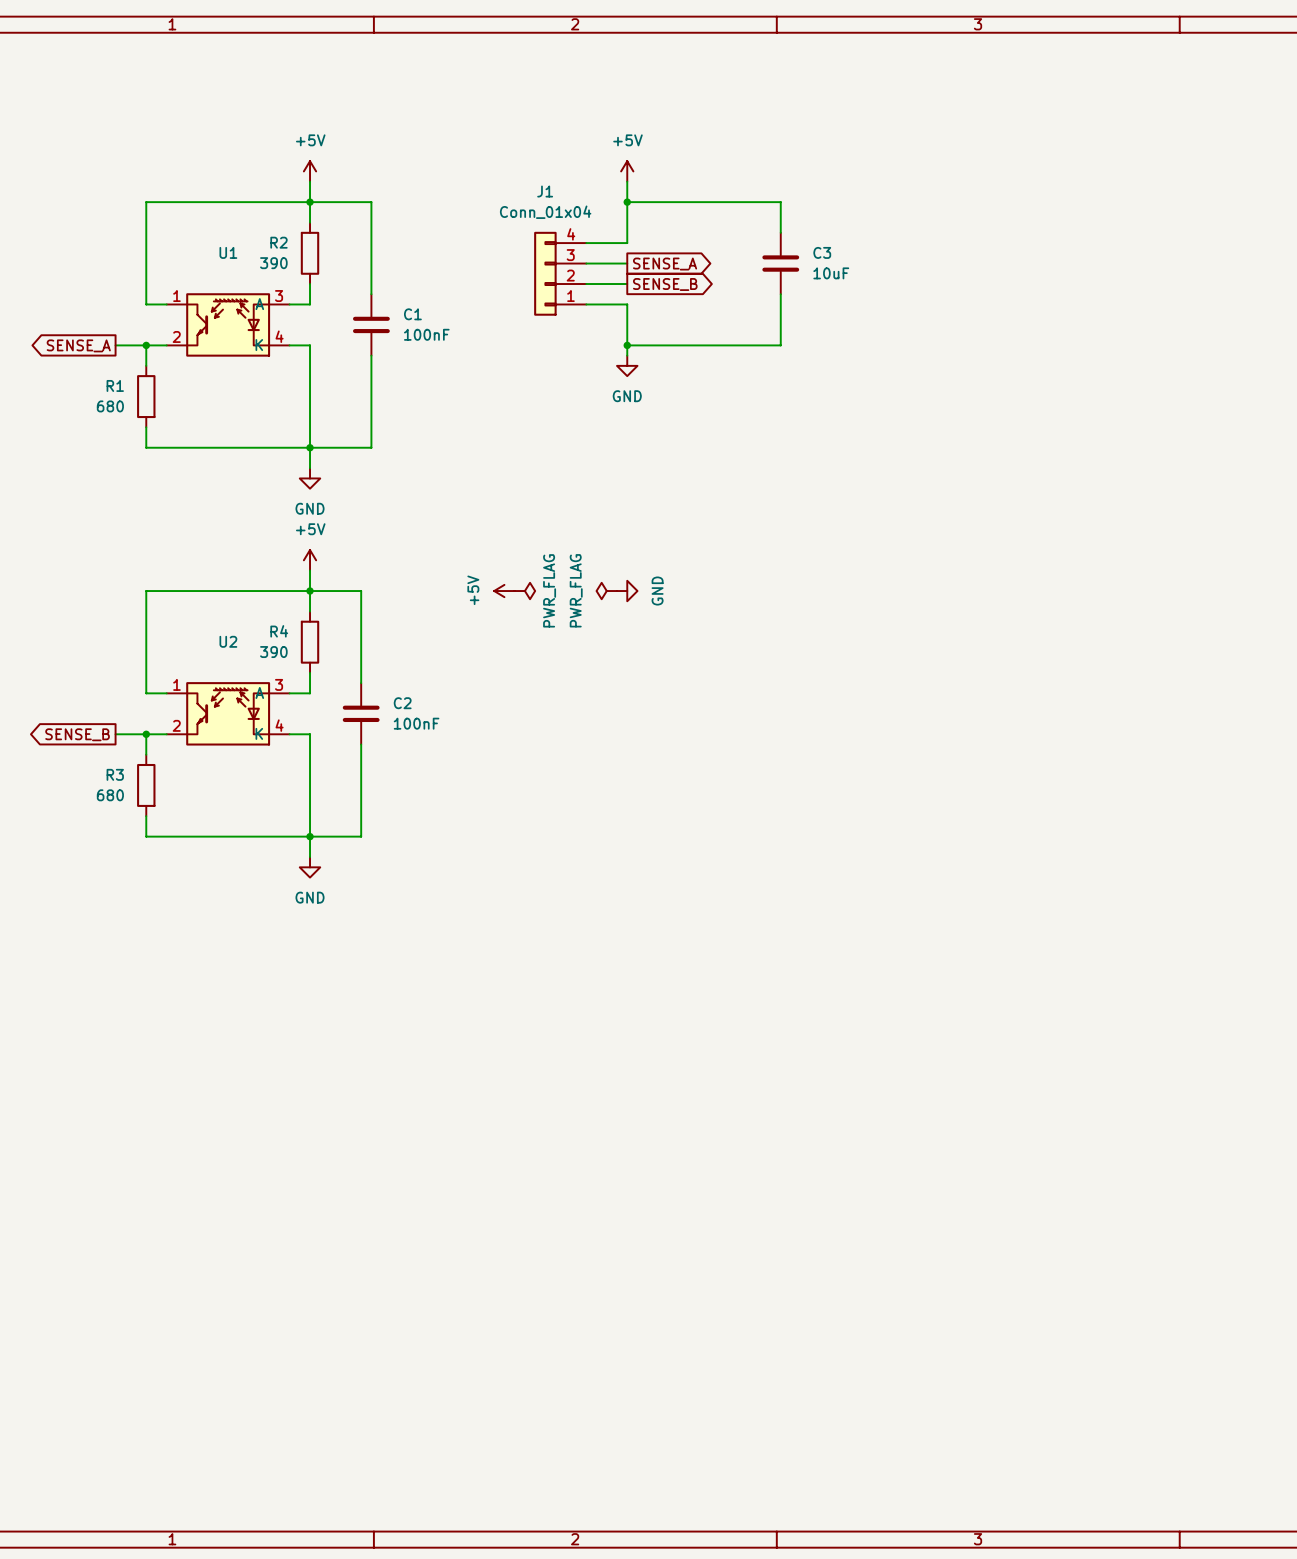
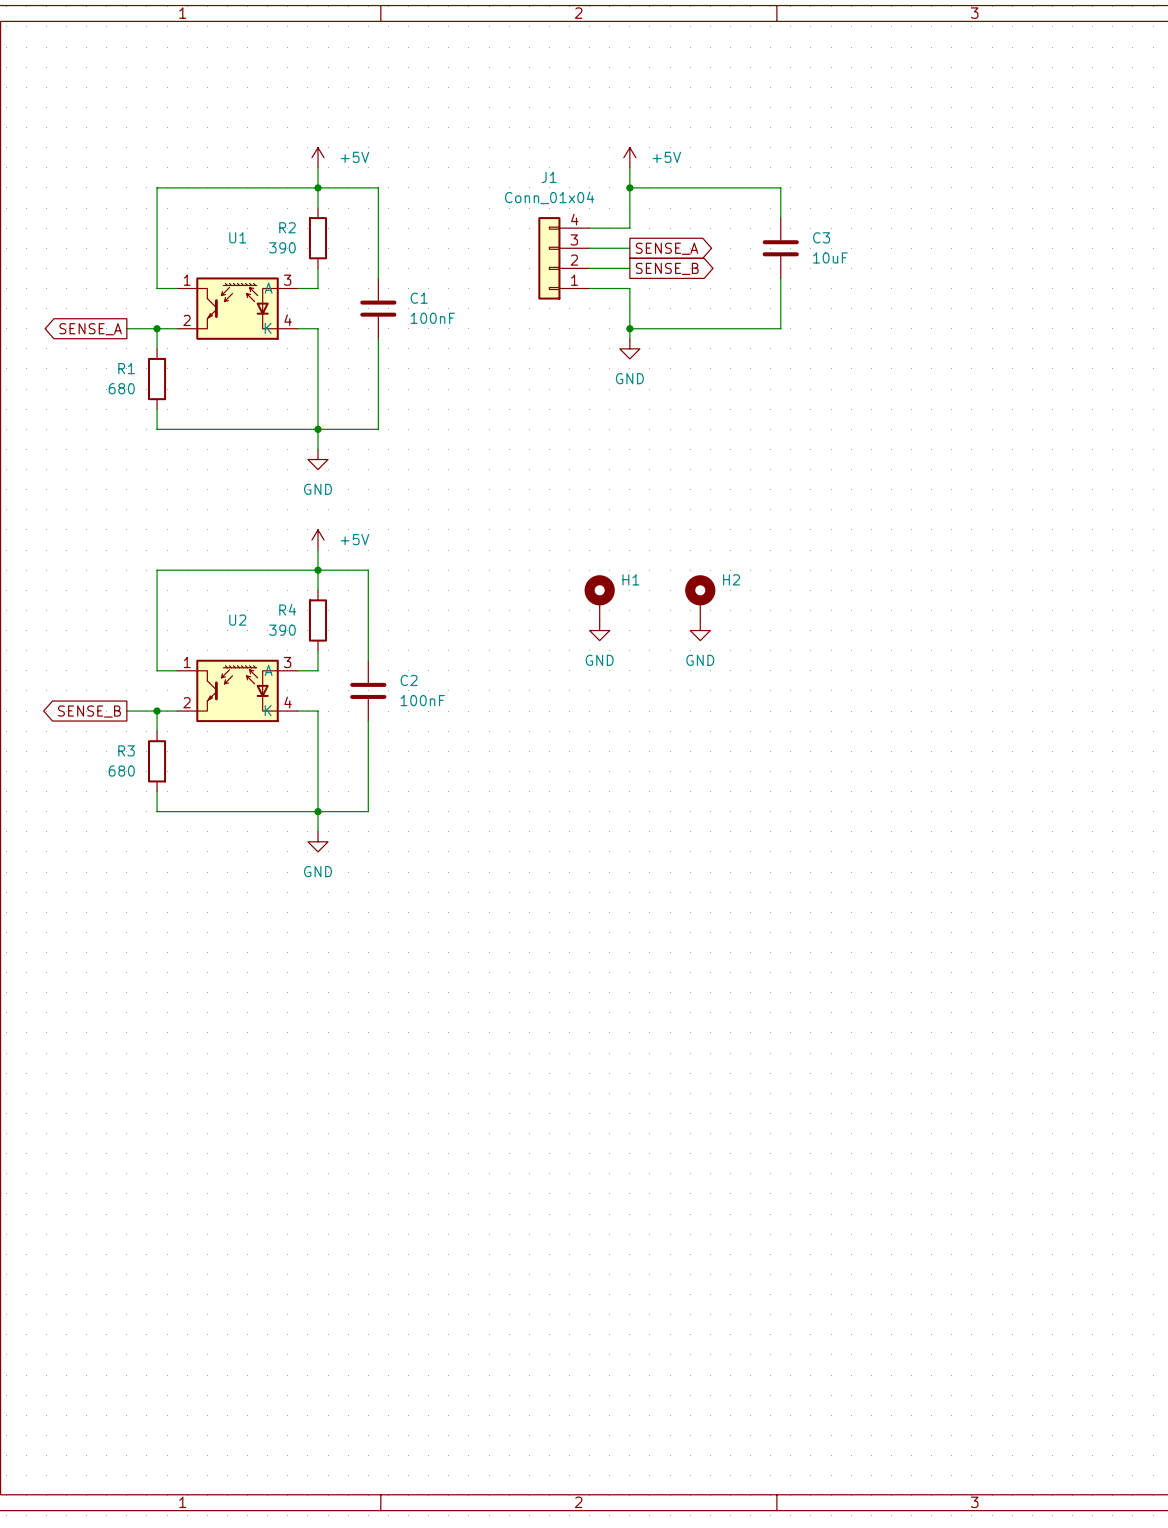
power symbol text position: +5V (310, 140) -> +5V (354, 157)
power symbol text position: +5V (627, 140) -> +5V (666, 157)
power symbol text position: +5V (310, 529) -> +5V (354, 539)
power symbol: +5V (504, 591) -> none
power symbol: PWR_FLAG (524, 591) -> none
power symbol: PWR_FLAG (606, 591) -> none
power symbol: GND (627, 591) -> none
H1: none -> (599, 597)
H2: none -> (700, 597)
power symbol: none -> GND (599, 630)
power symbol: none -> GND (700, 630)

